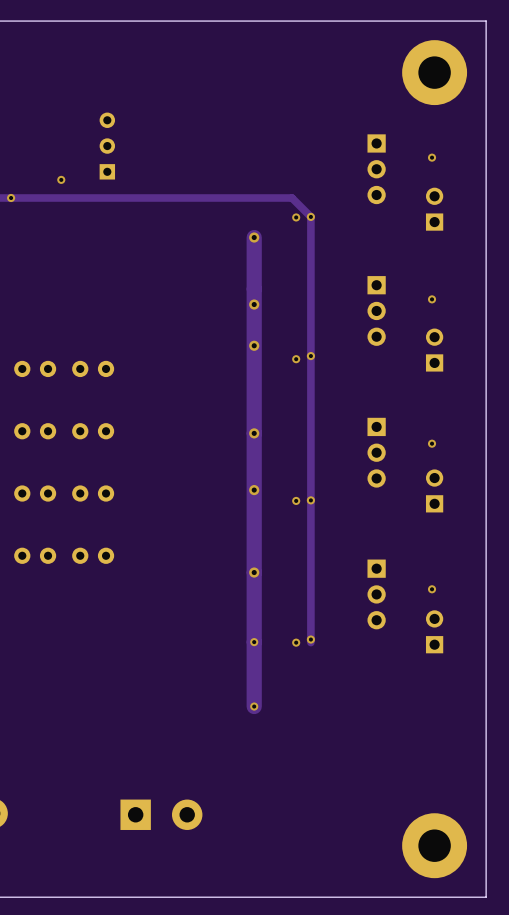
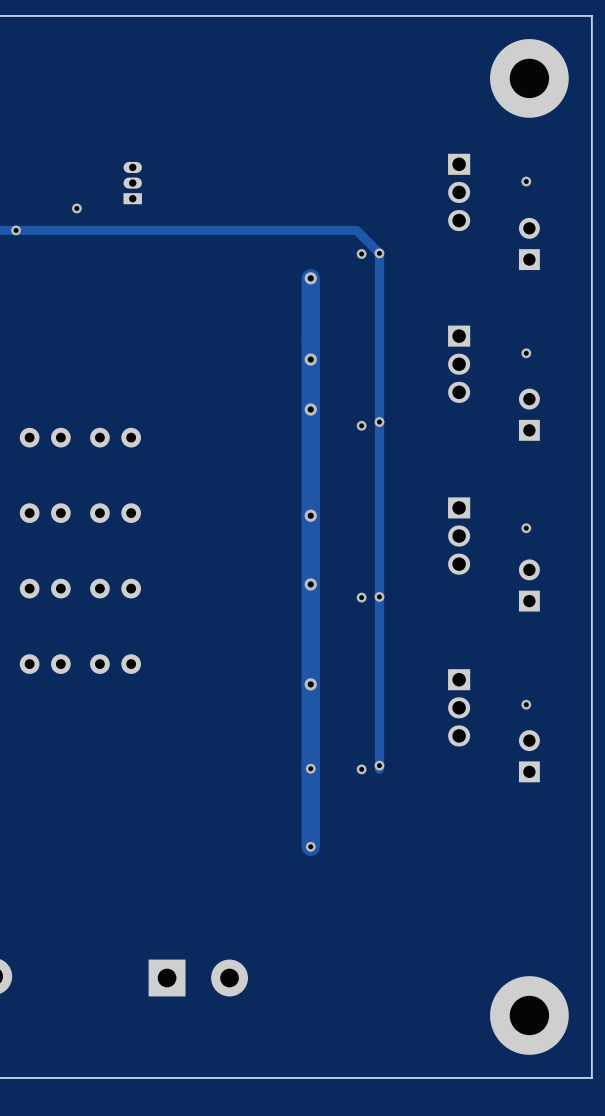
part footprint: [367, 134, 386, 205] -> [448, 153, 471, 232]
part: (107, 146) -> none
part: none -> (132, 183)
part footprint: [367, 276, 386, 346] -> [448, 325, 471, 403]
part footprint: [367, 417, 386, 488] -> [448, 497, 471, 575]
part footprint: [367, 559, 386, 630] -> [448, 669, 471, 747]

